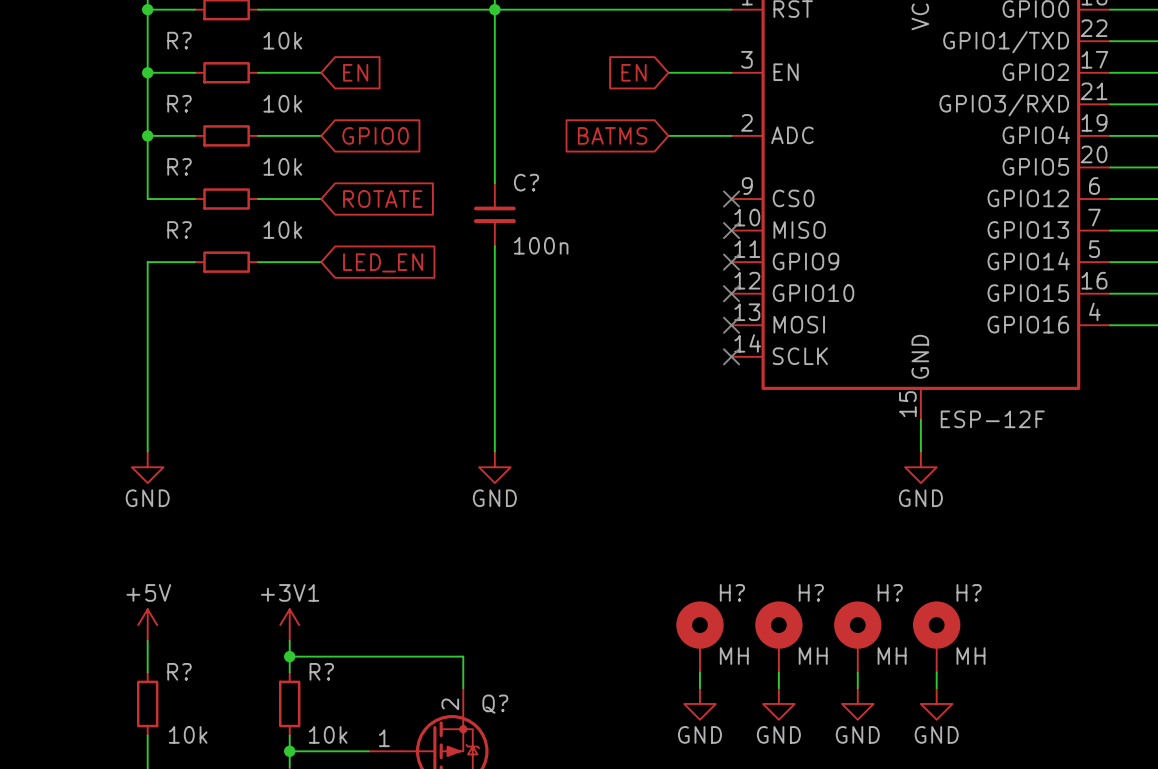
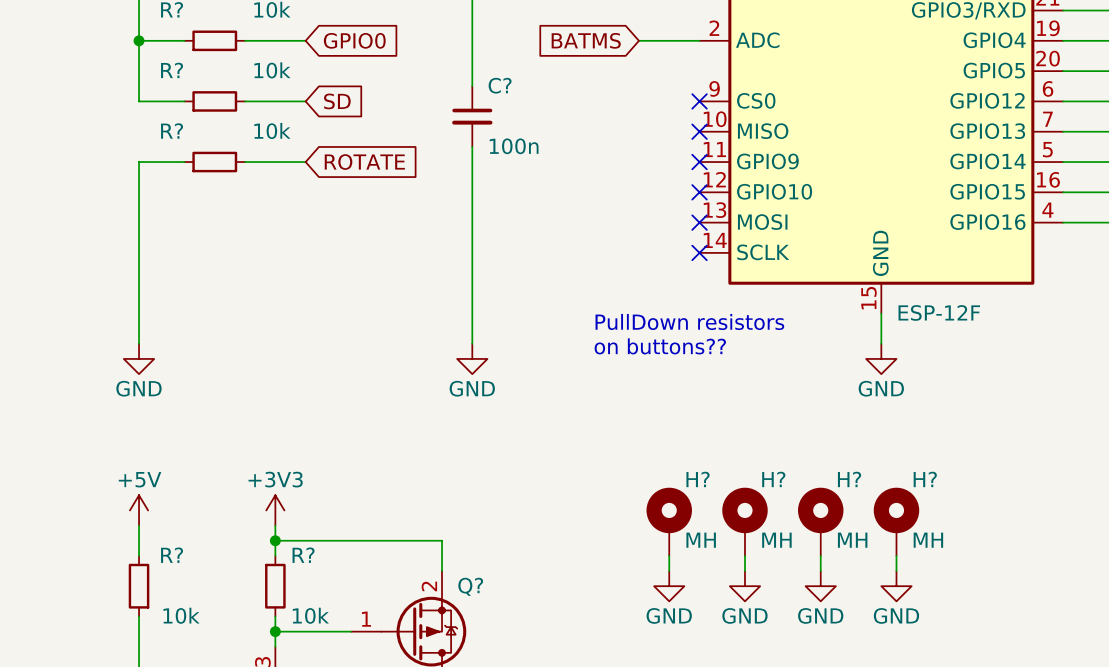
global label: ROTATE (382, 199) -> SD (337, 101)
global label: LED_EN (383, 262) -> ROTATE (364, 162)
text: none -> PullDown resistors (689, 321)
text: none -> on buttons?? (660, 346)
power symbol: +3V1 (289, 625) -> +3V3 (275, 510)

